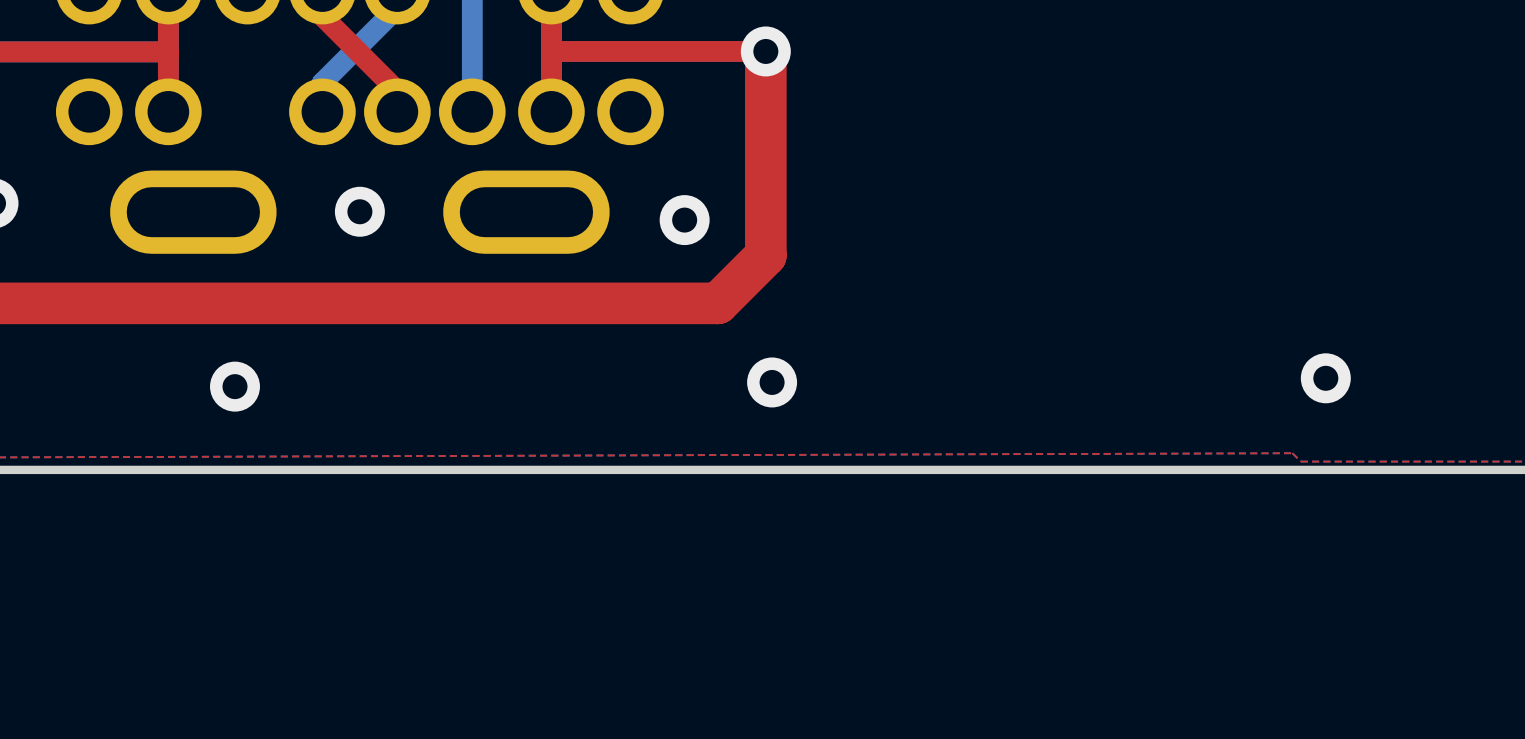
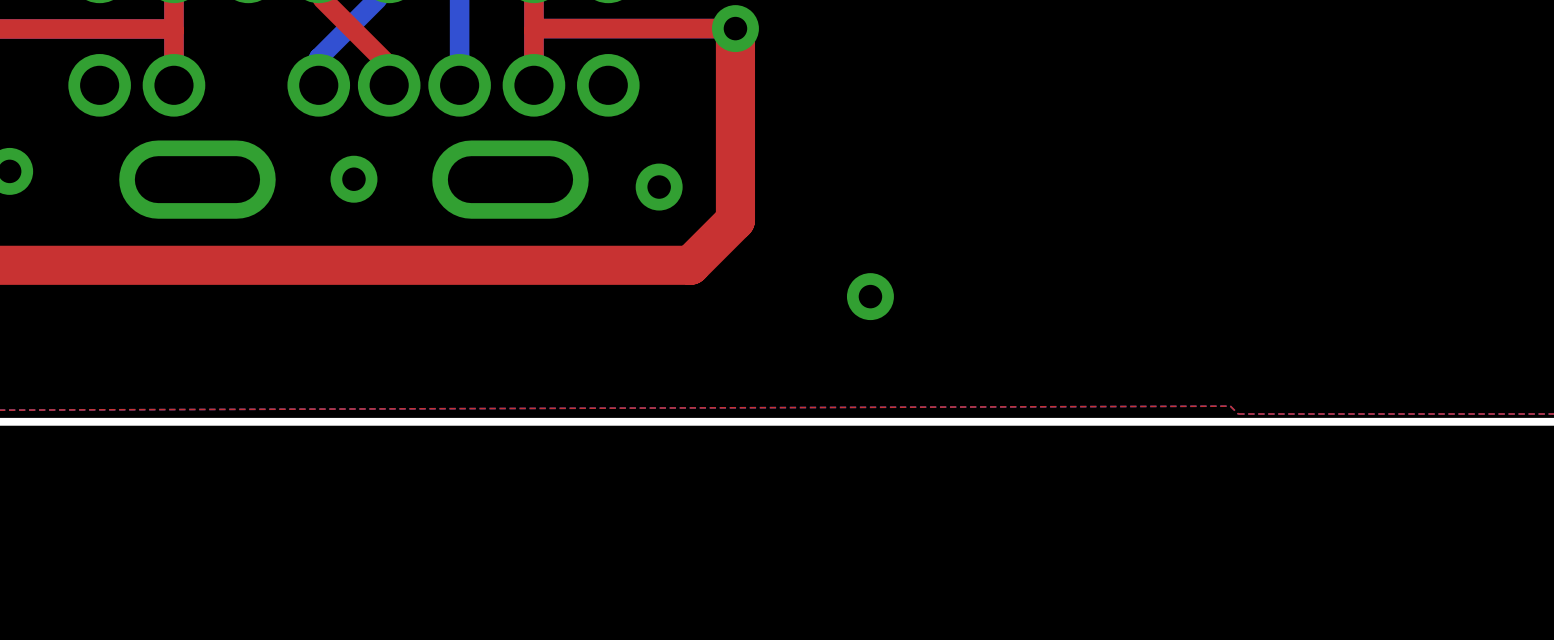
via: (1325, 378) -> none
via position: (772, 382) -> (870, 296)
via: (234, 386) -> none

